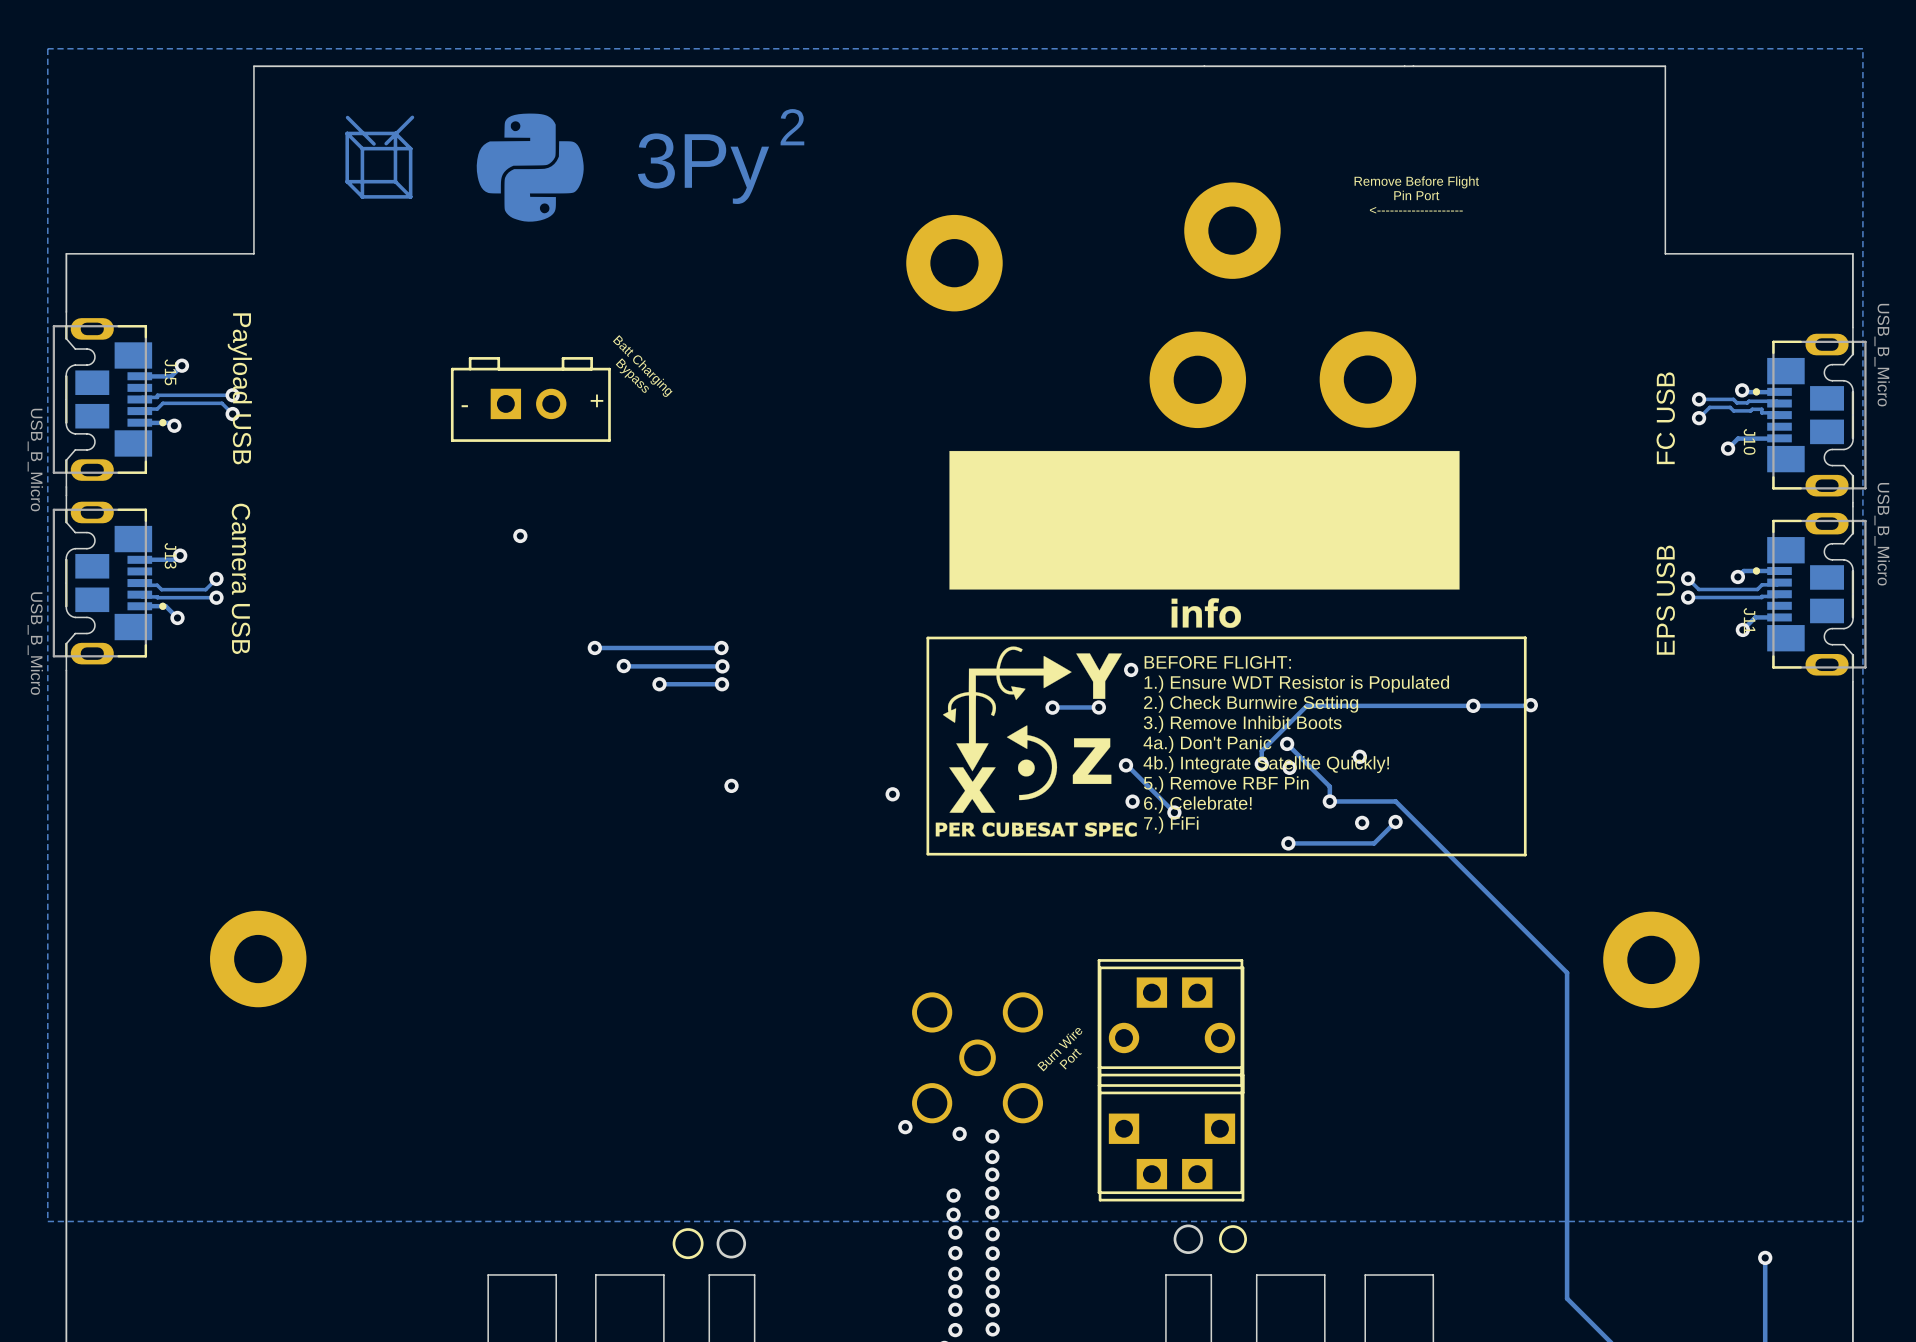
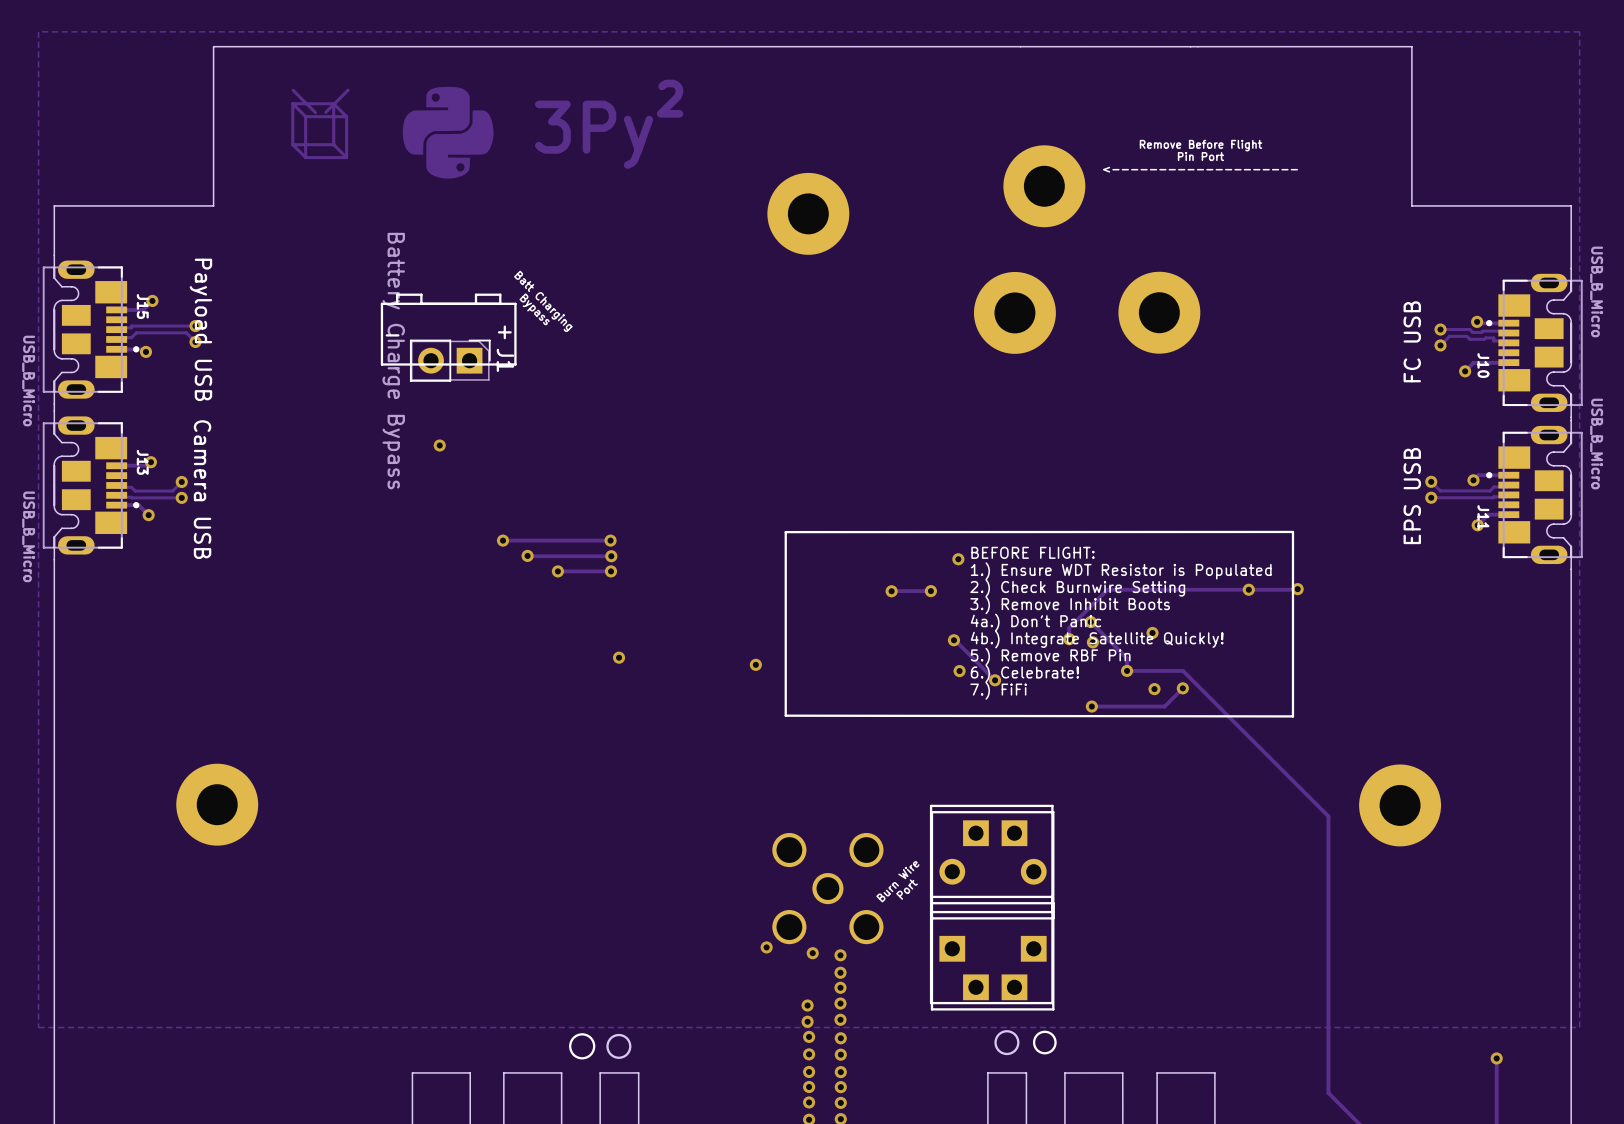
J1 side: top (528, 403) -> bottom (450, 360)
drawing: [935, 450, 1460, 837] -> none

